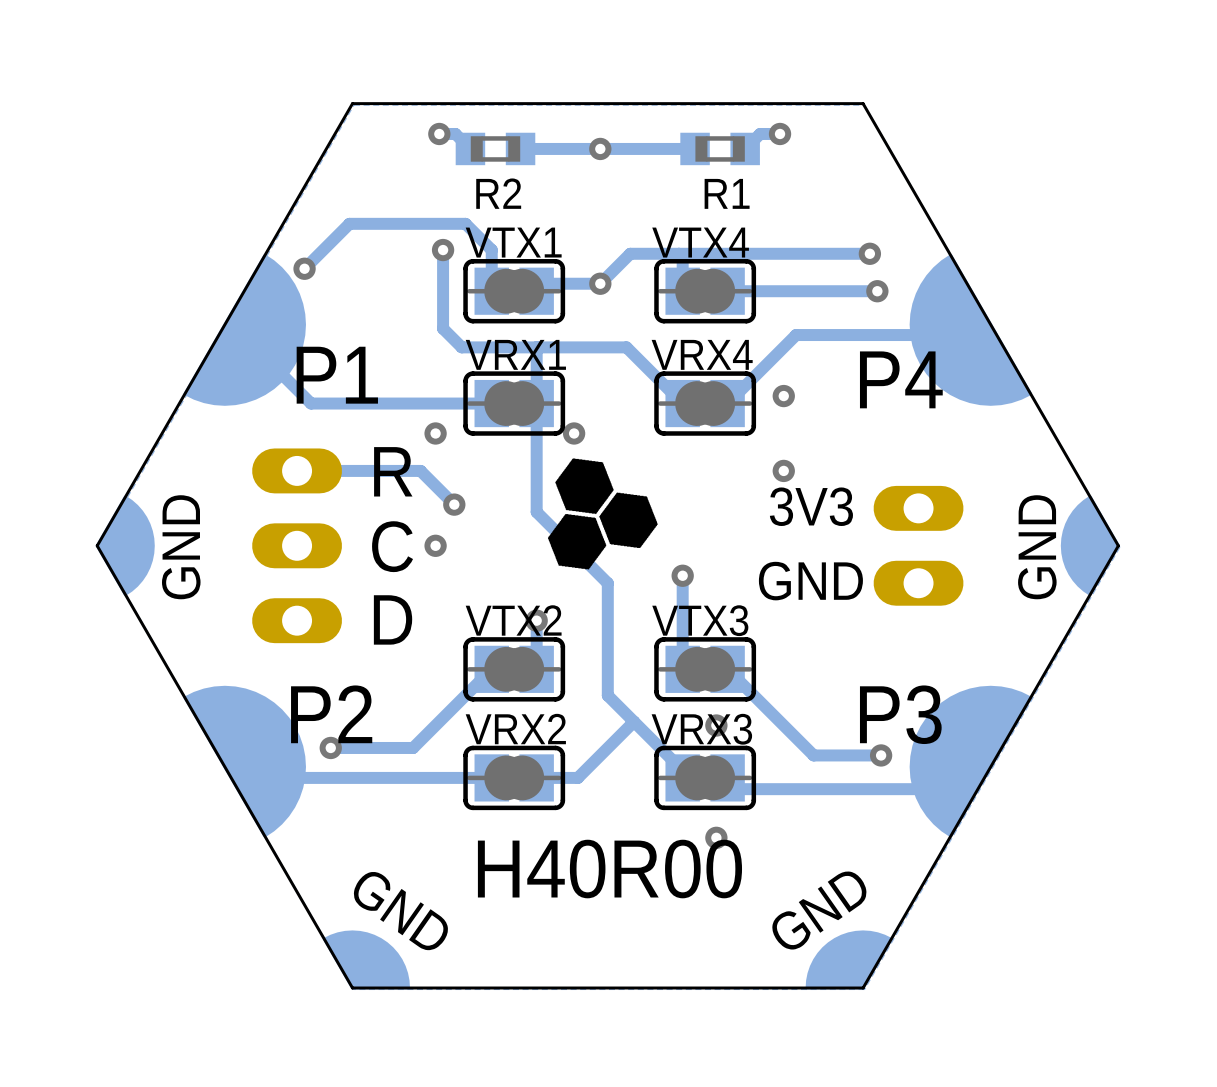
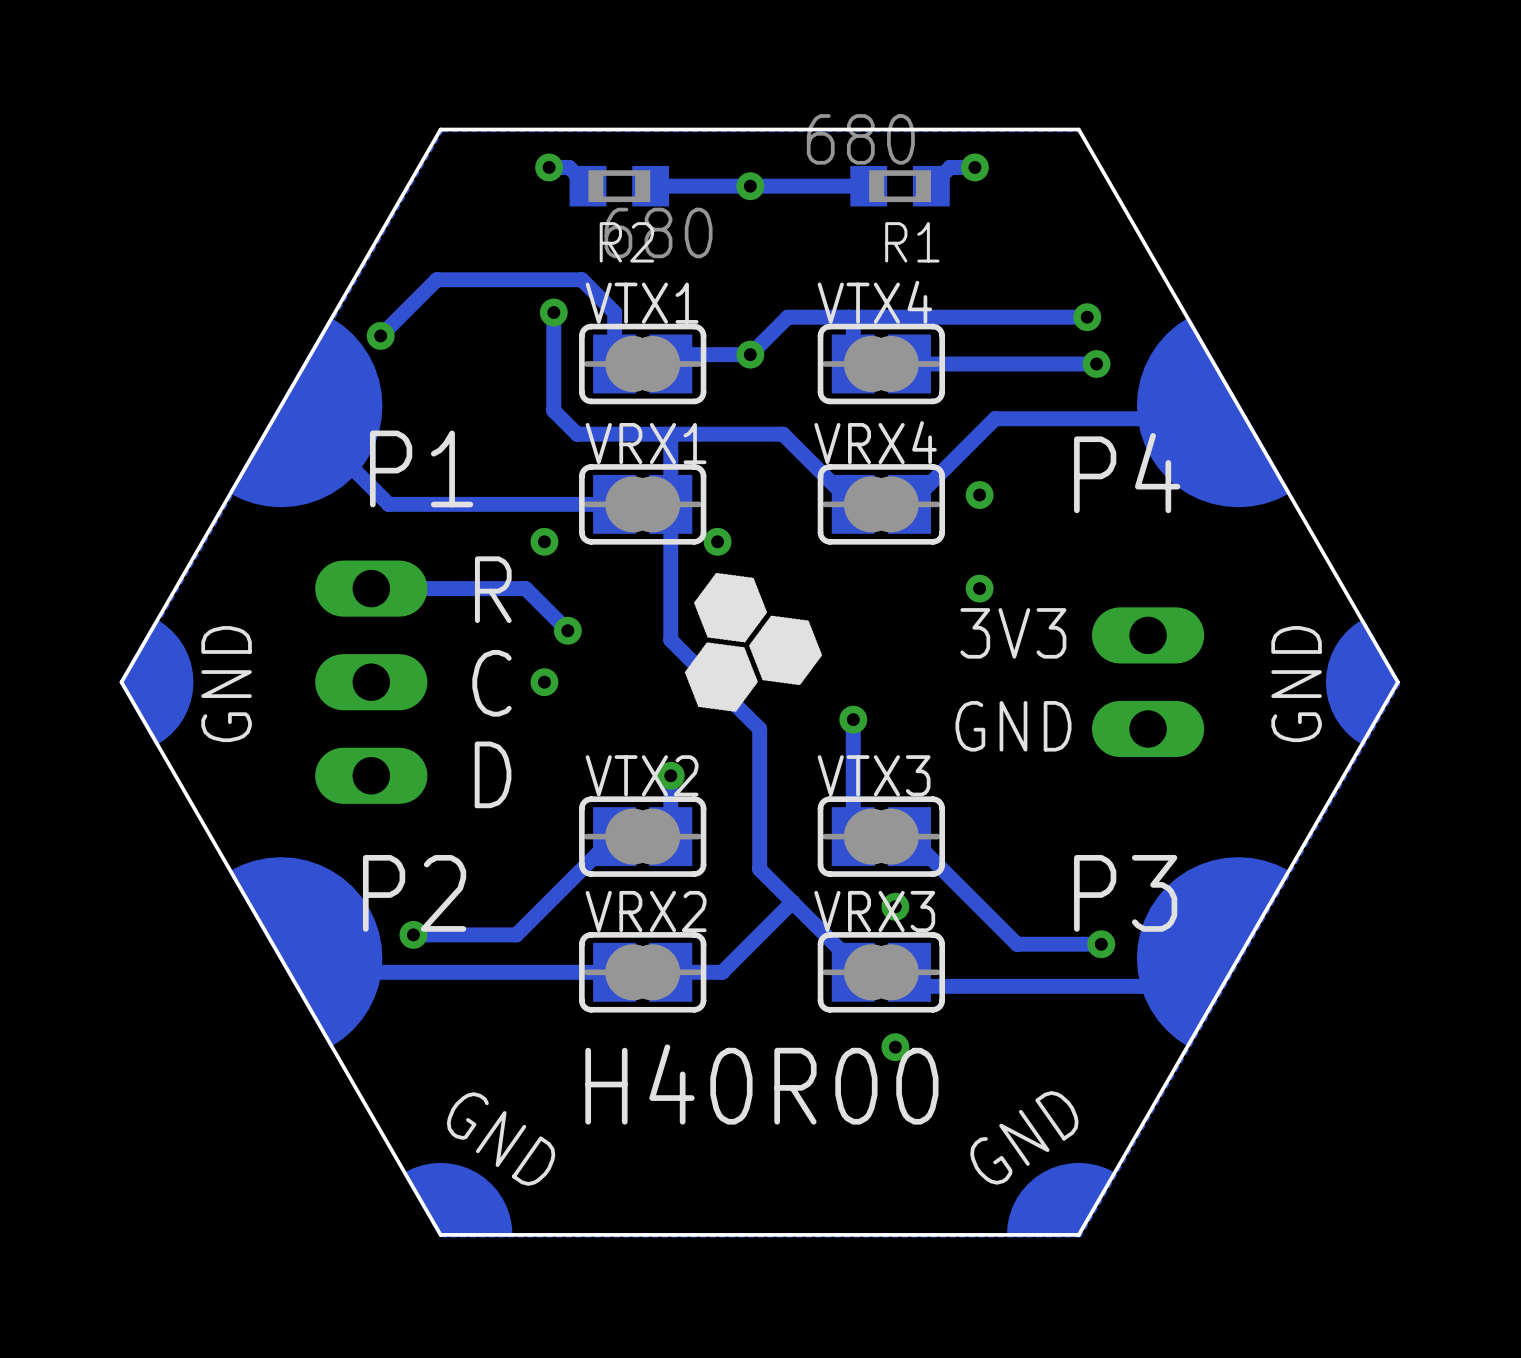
R1 value: none -> 680 (860, 139)
R2 value: none -> 680 (658, 232)

